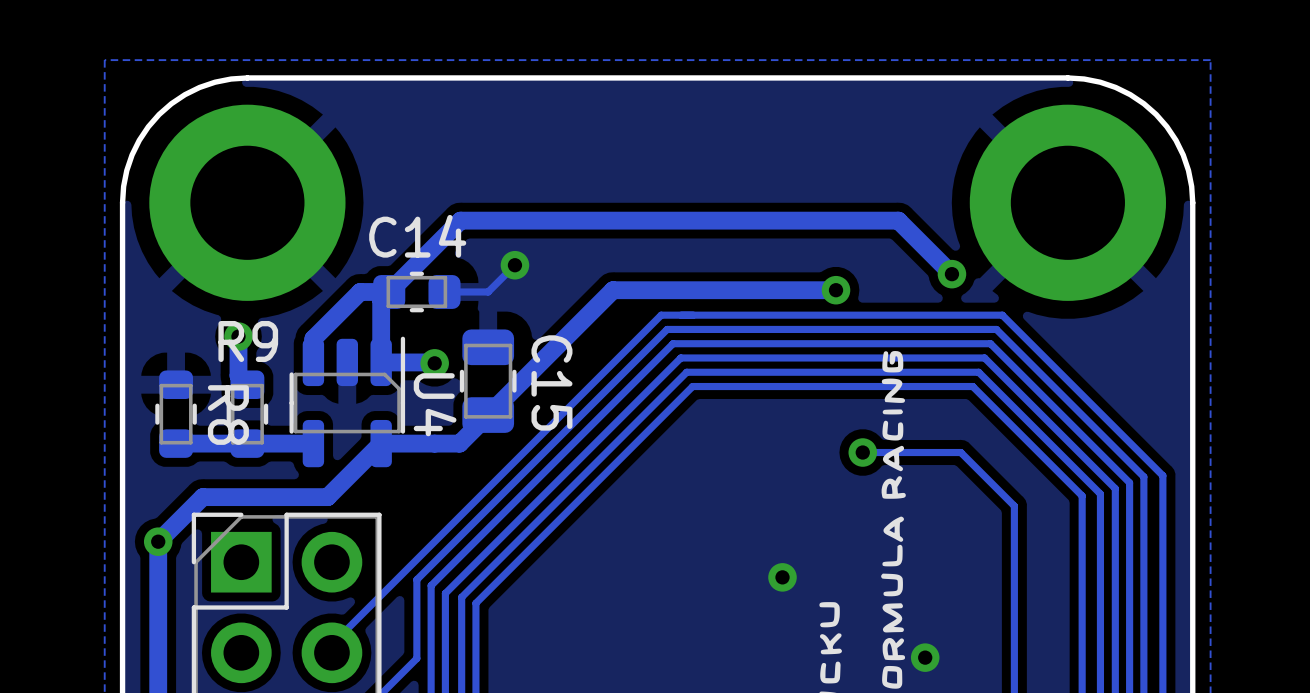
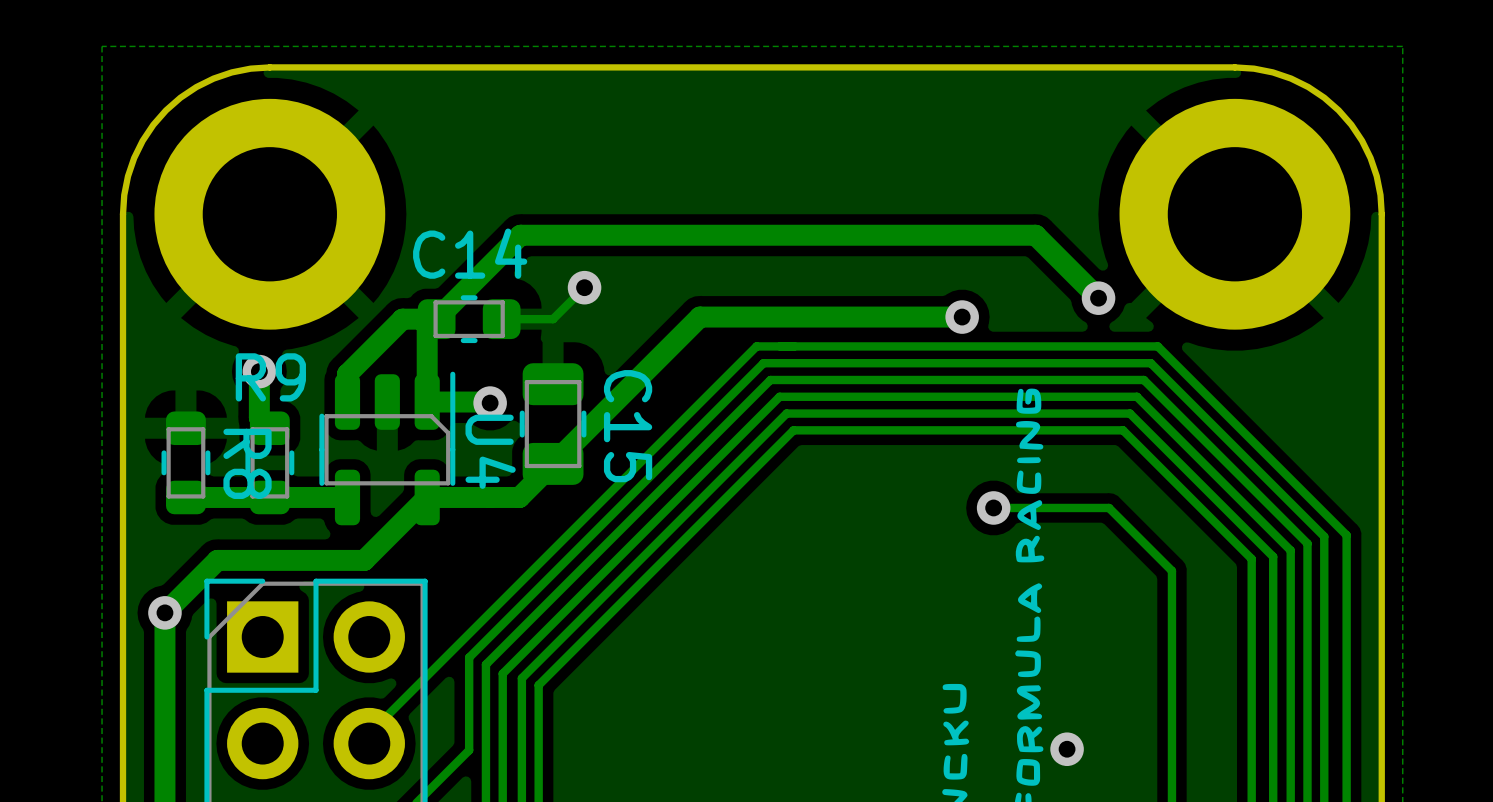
via: (782, 577) -> none

